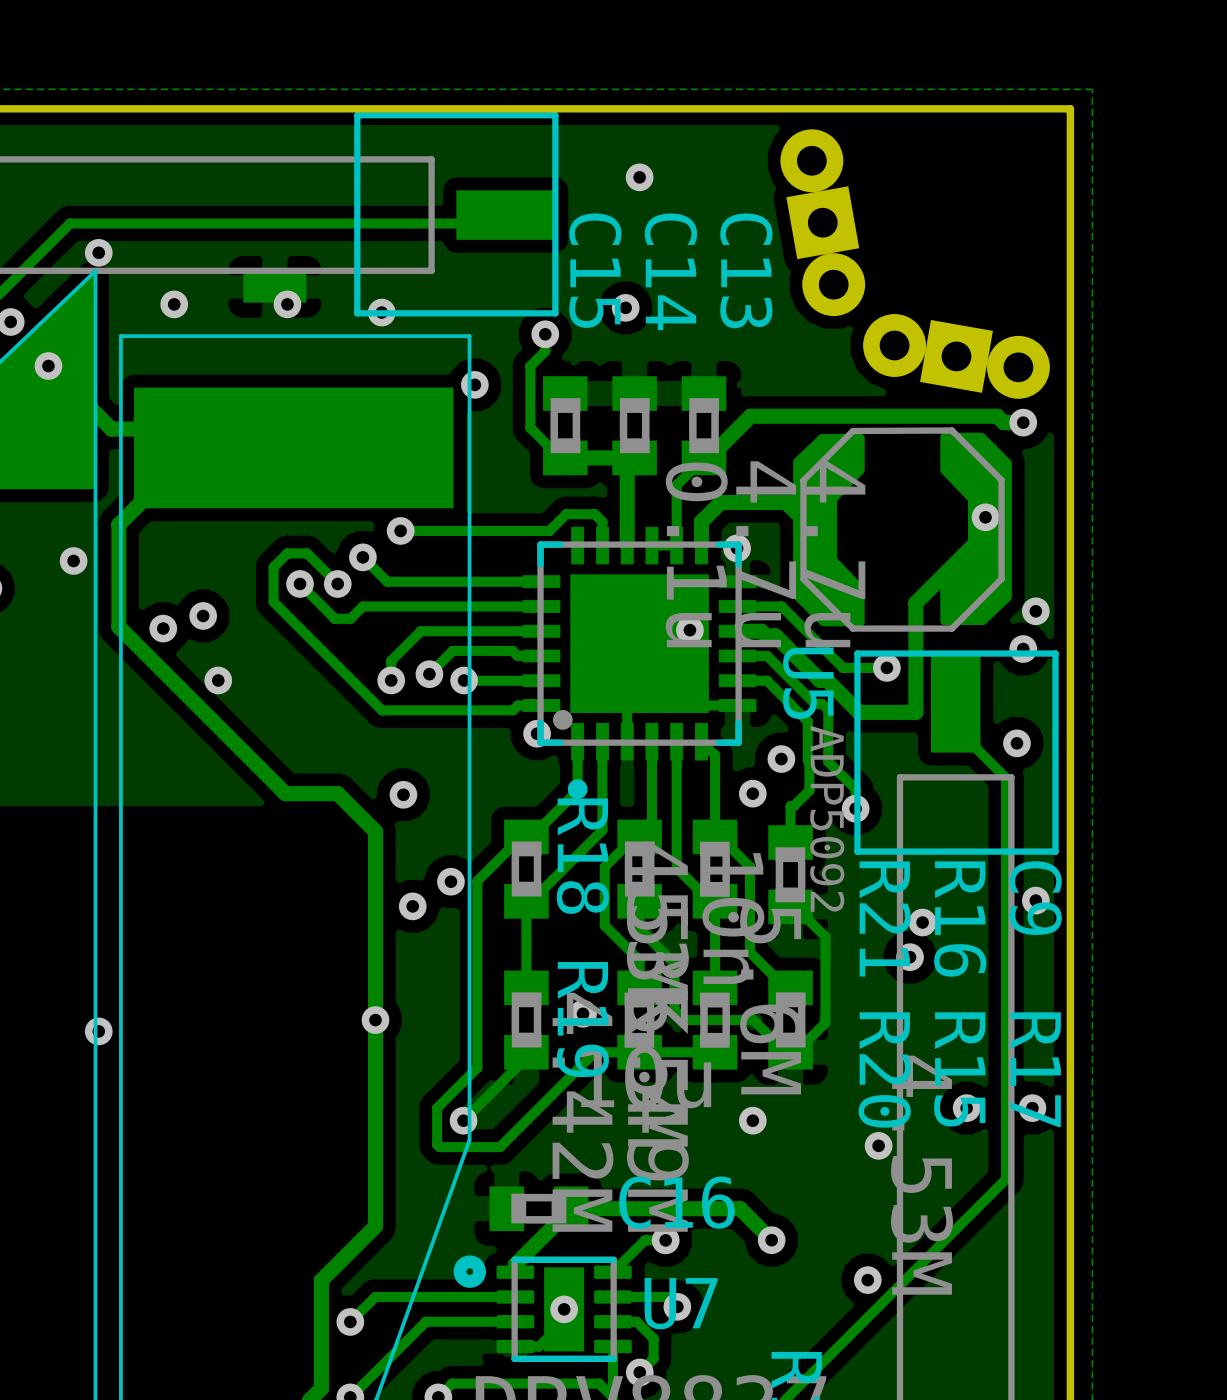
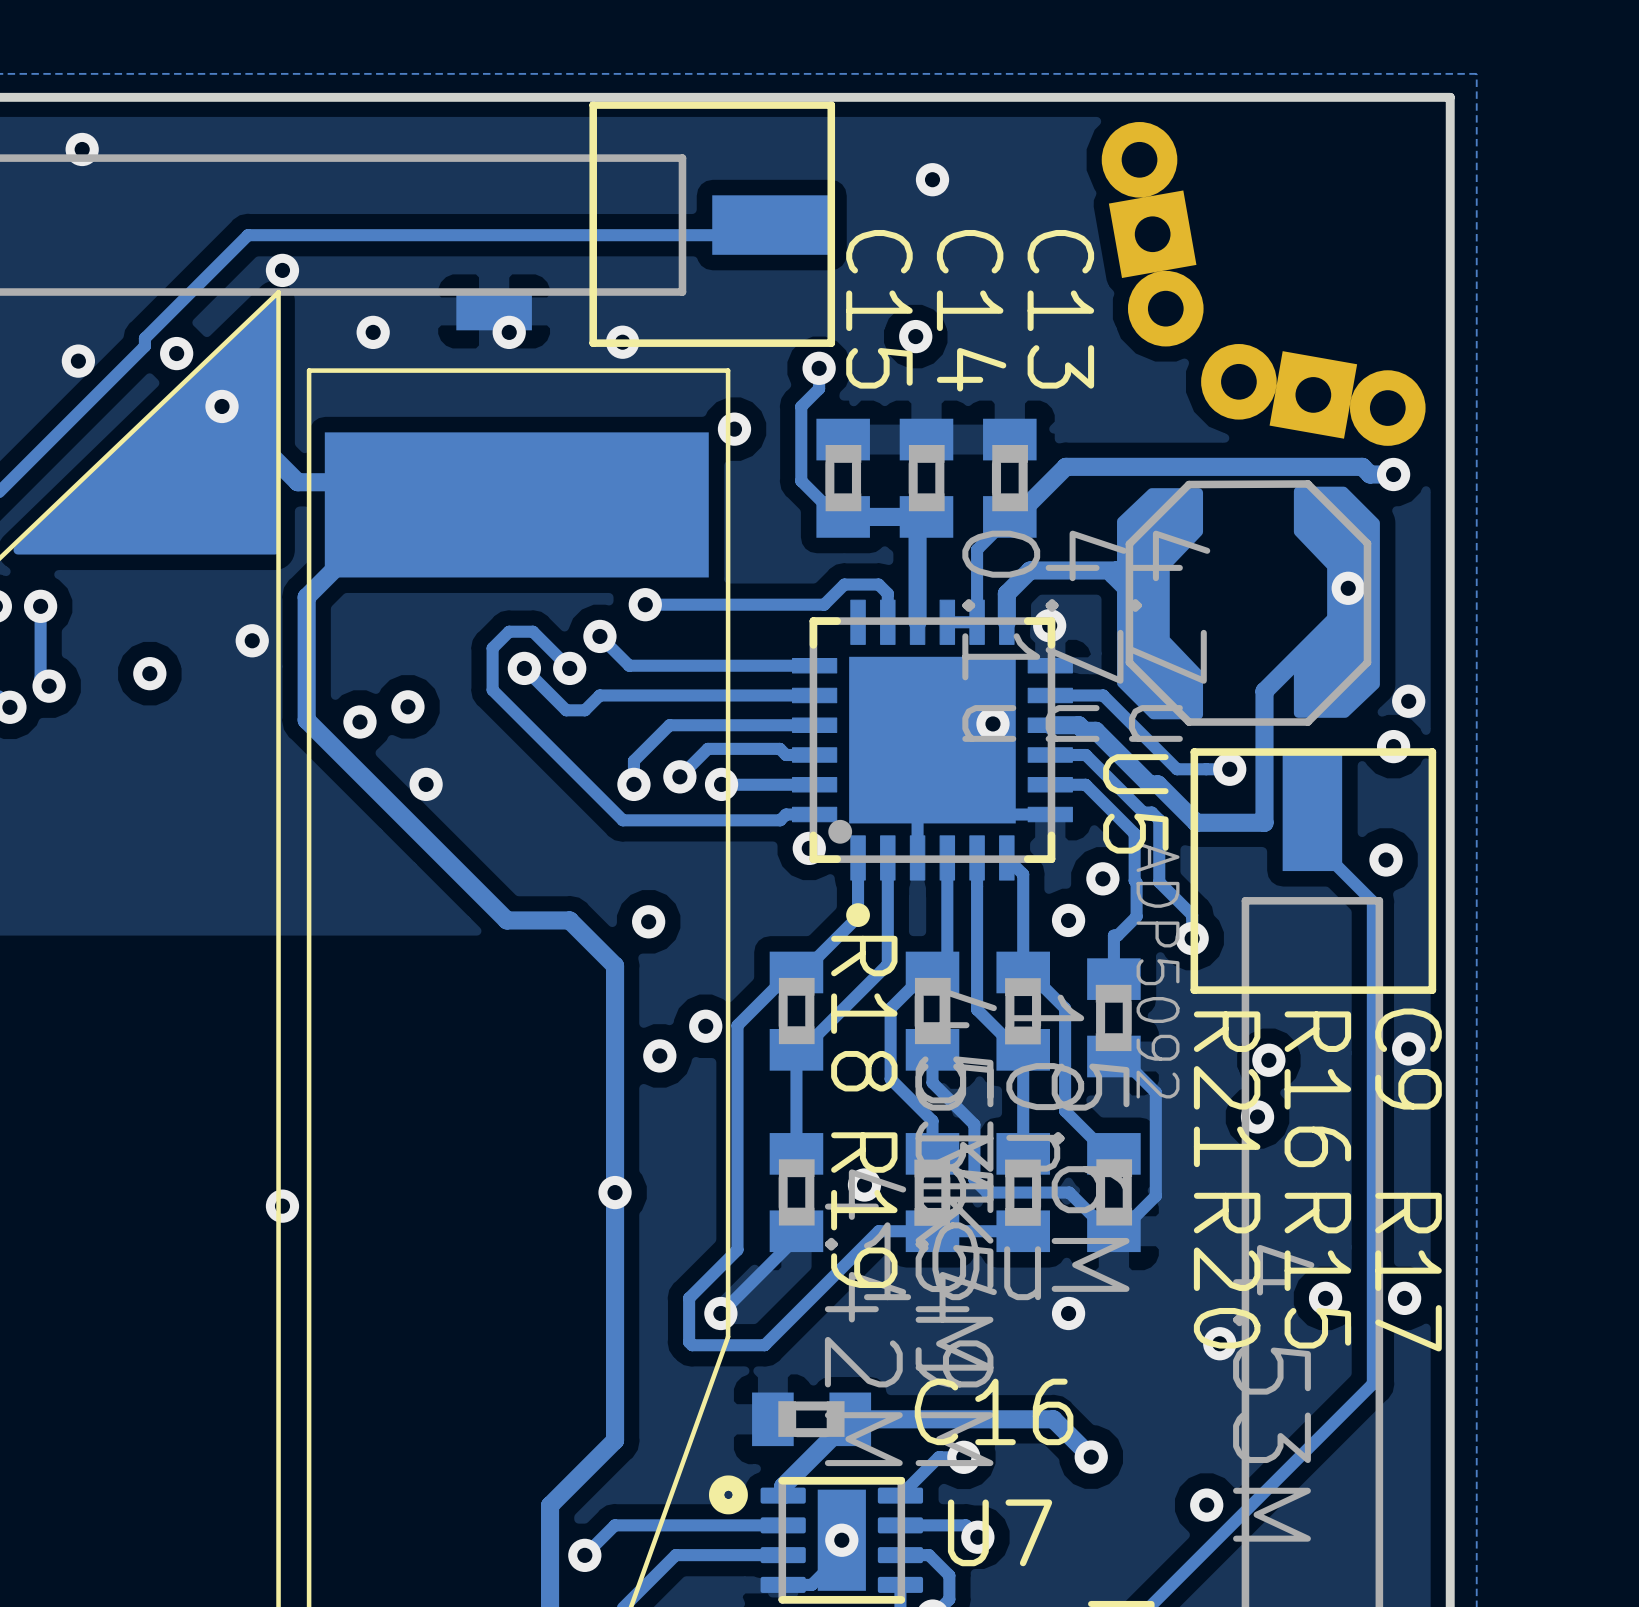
via position: (922, 922) -> (1268, 1060)

